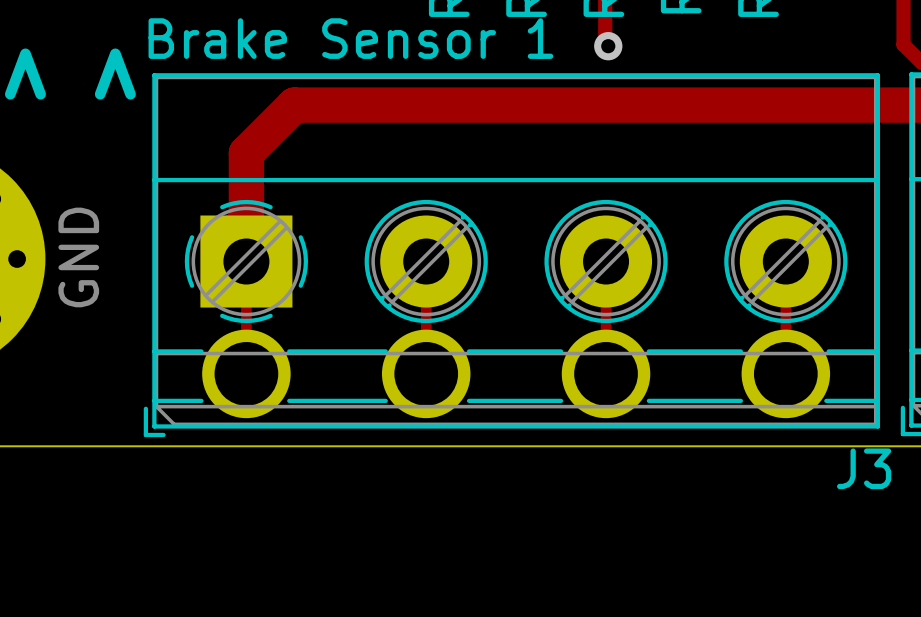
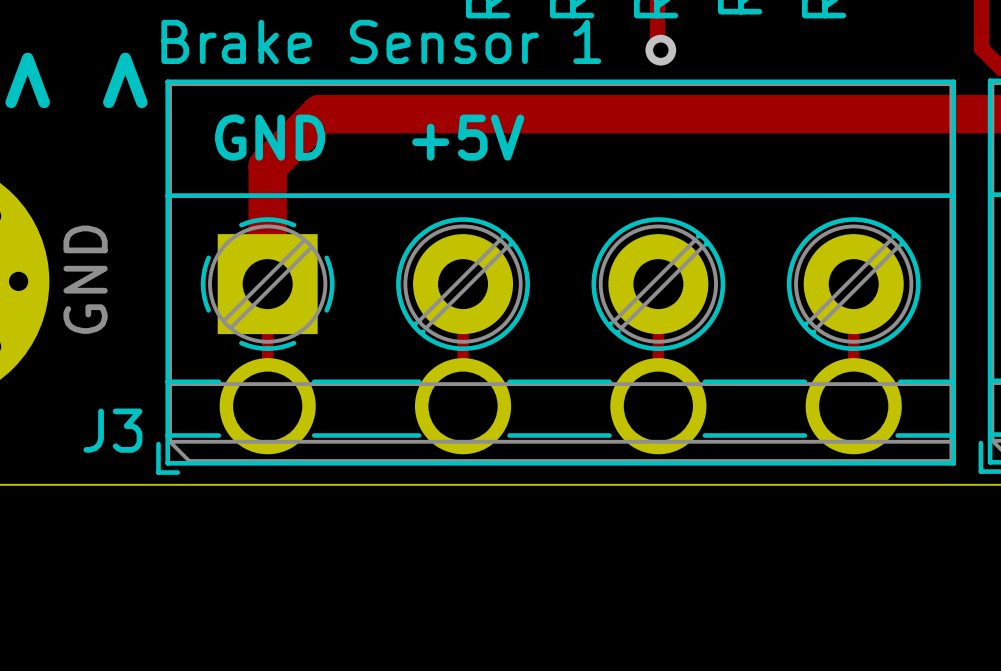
text: none -> GND (270, 137)
text: none -> +5V (468, 137)
J3 name position: J3 (864, 468) -> J3 (112, 430)

